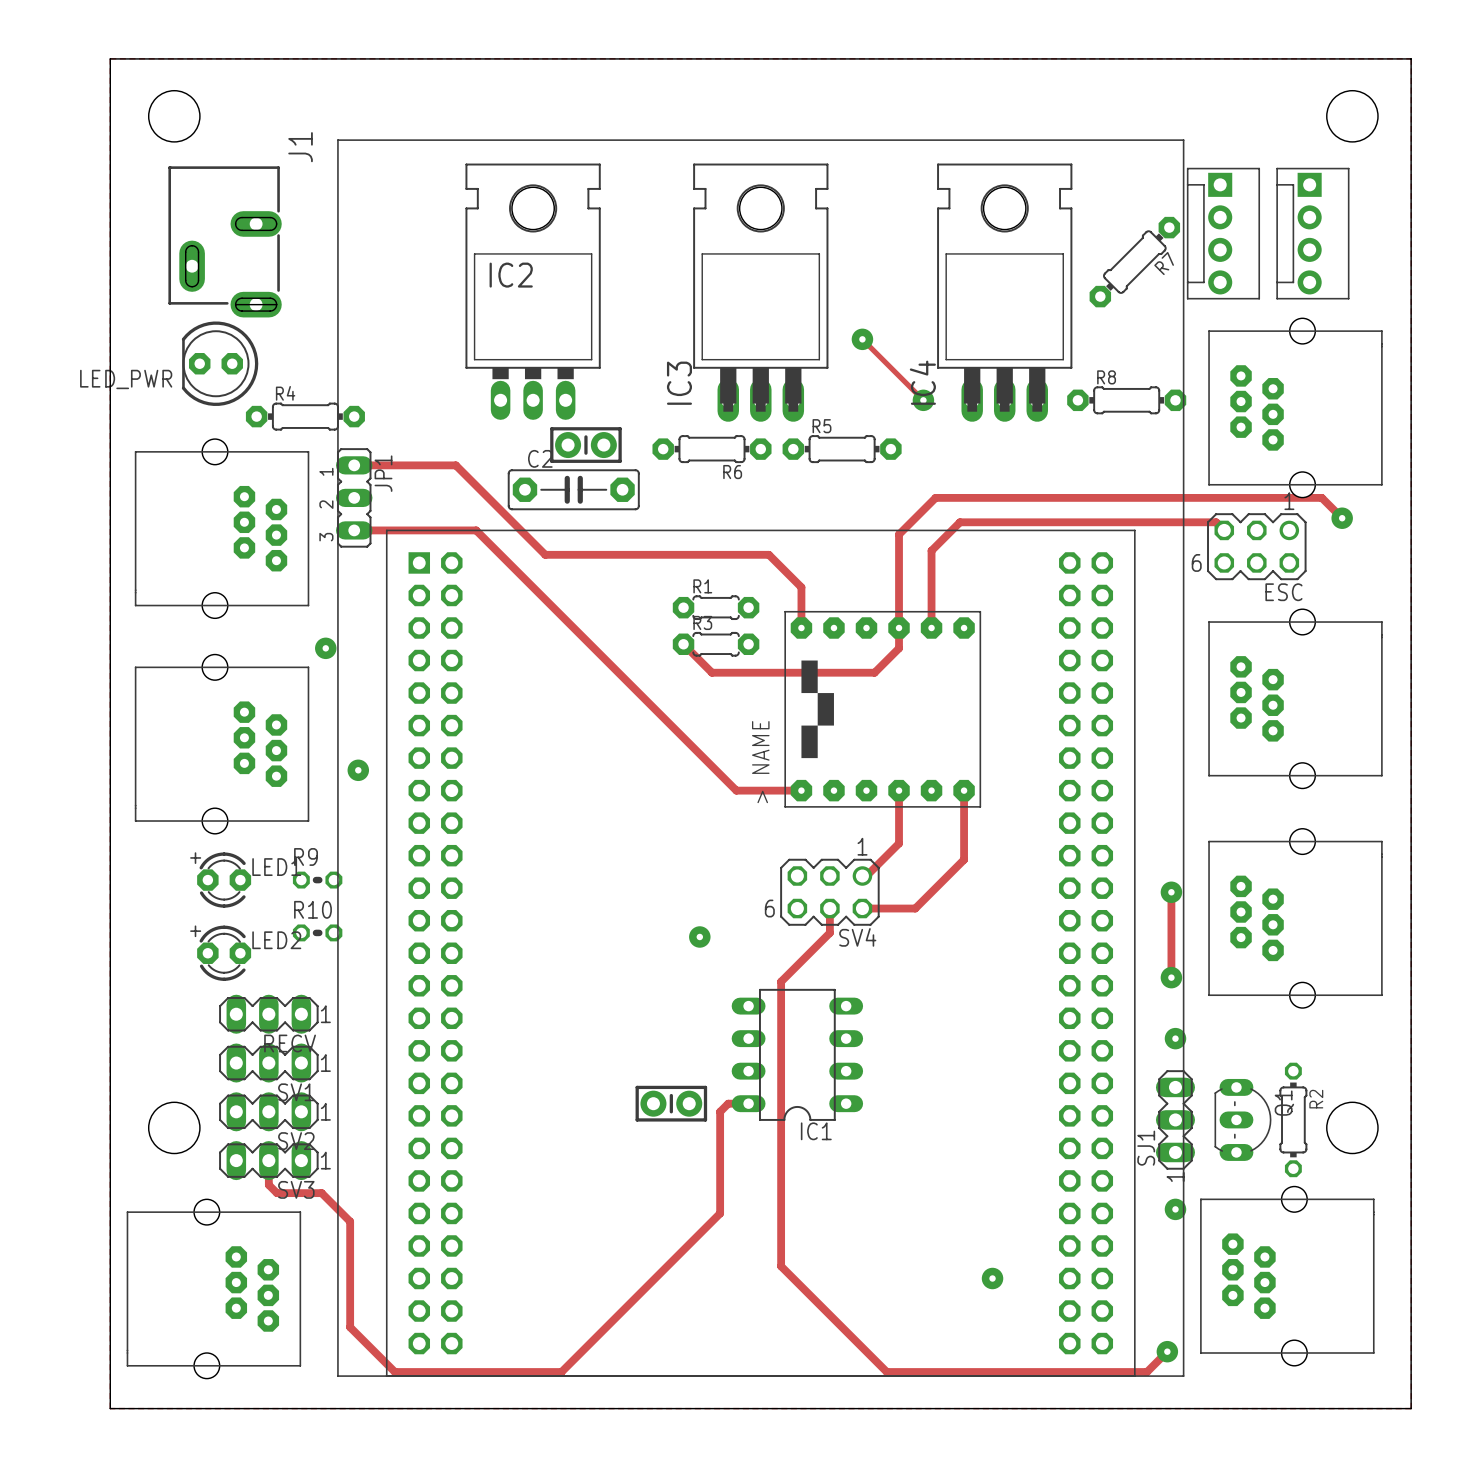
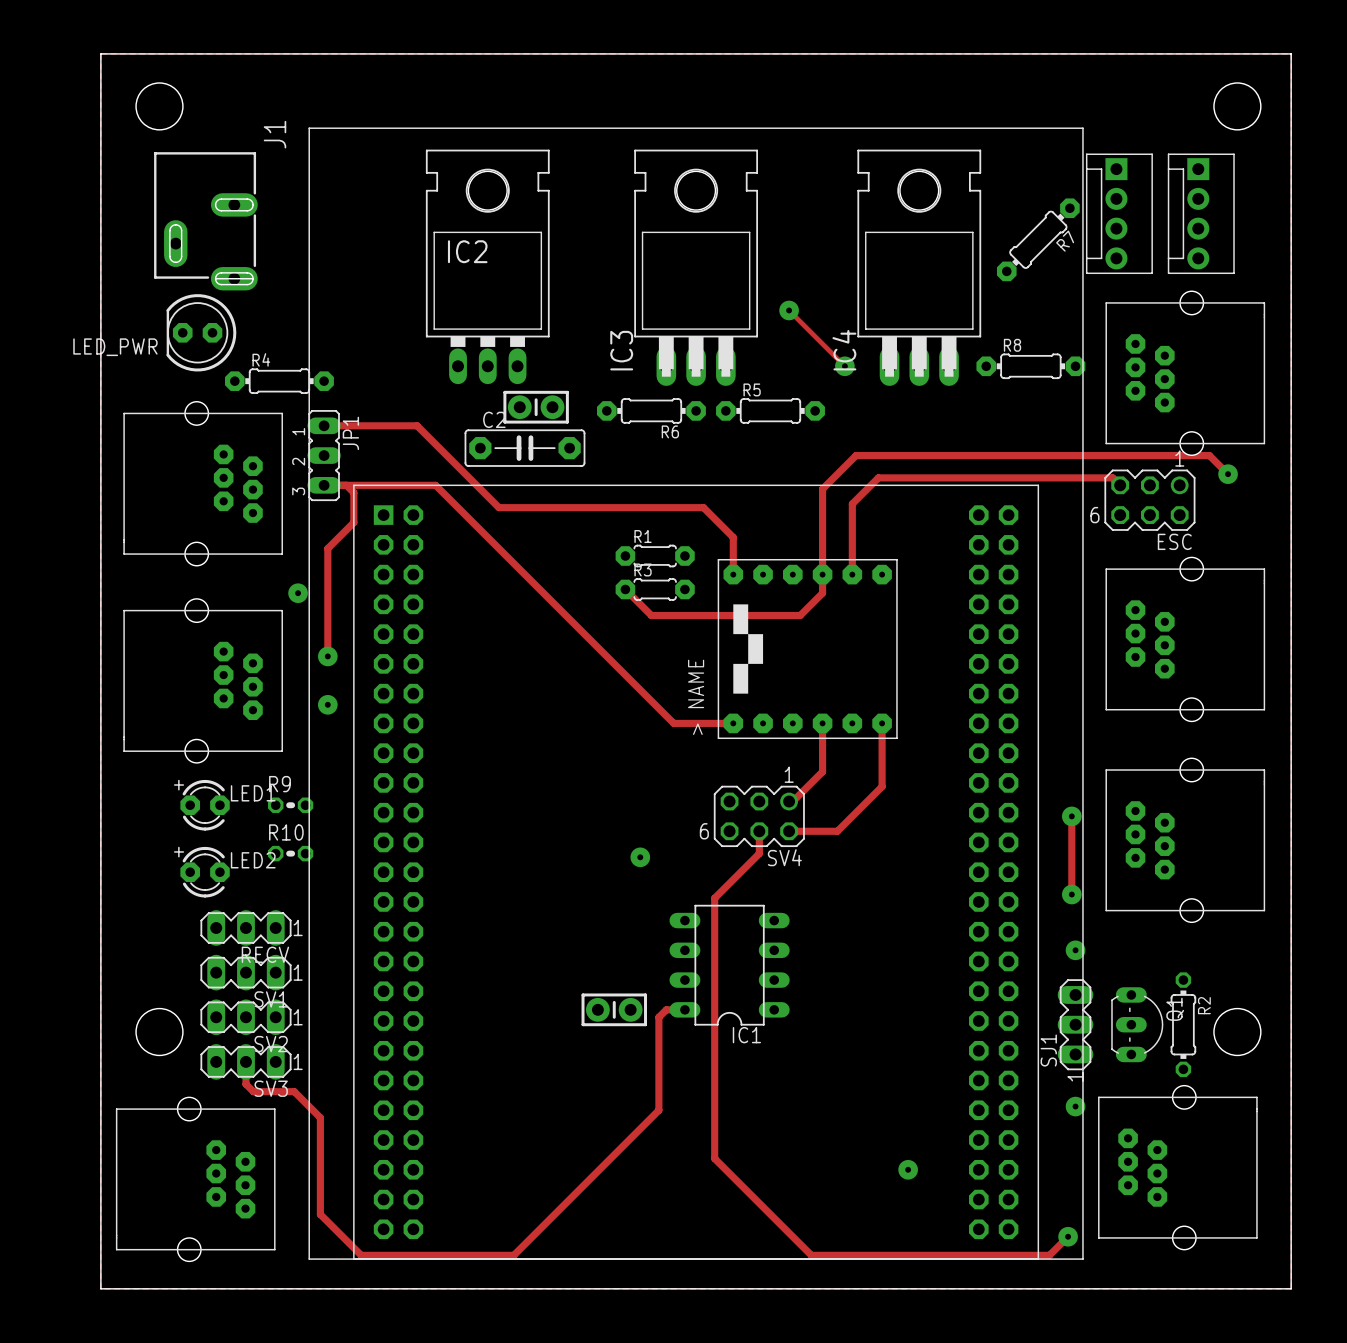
track: none -> (346, 485) (353, 492) (353, 522) (327, 548) (327, 656)
via: none -> (327, 656)

